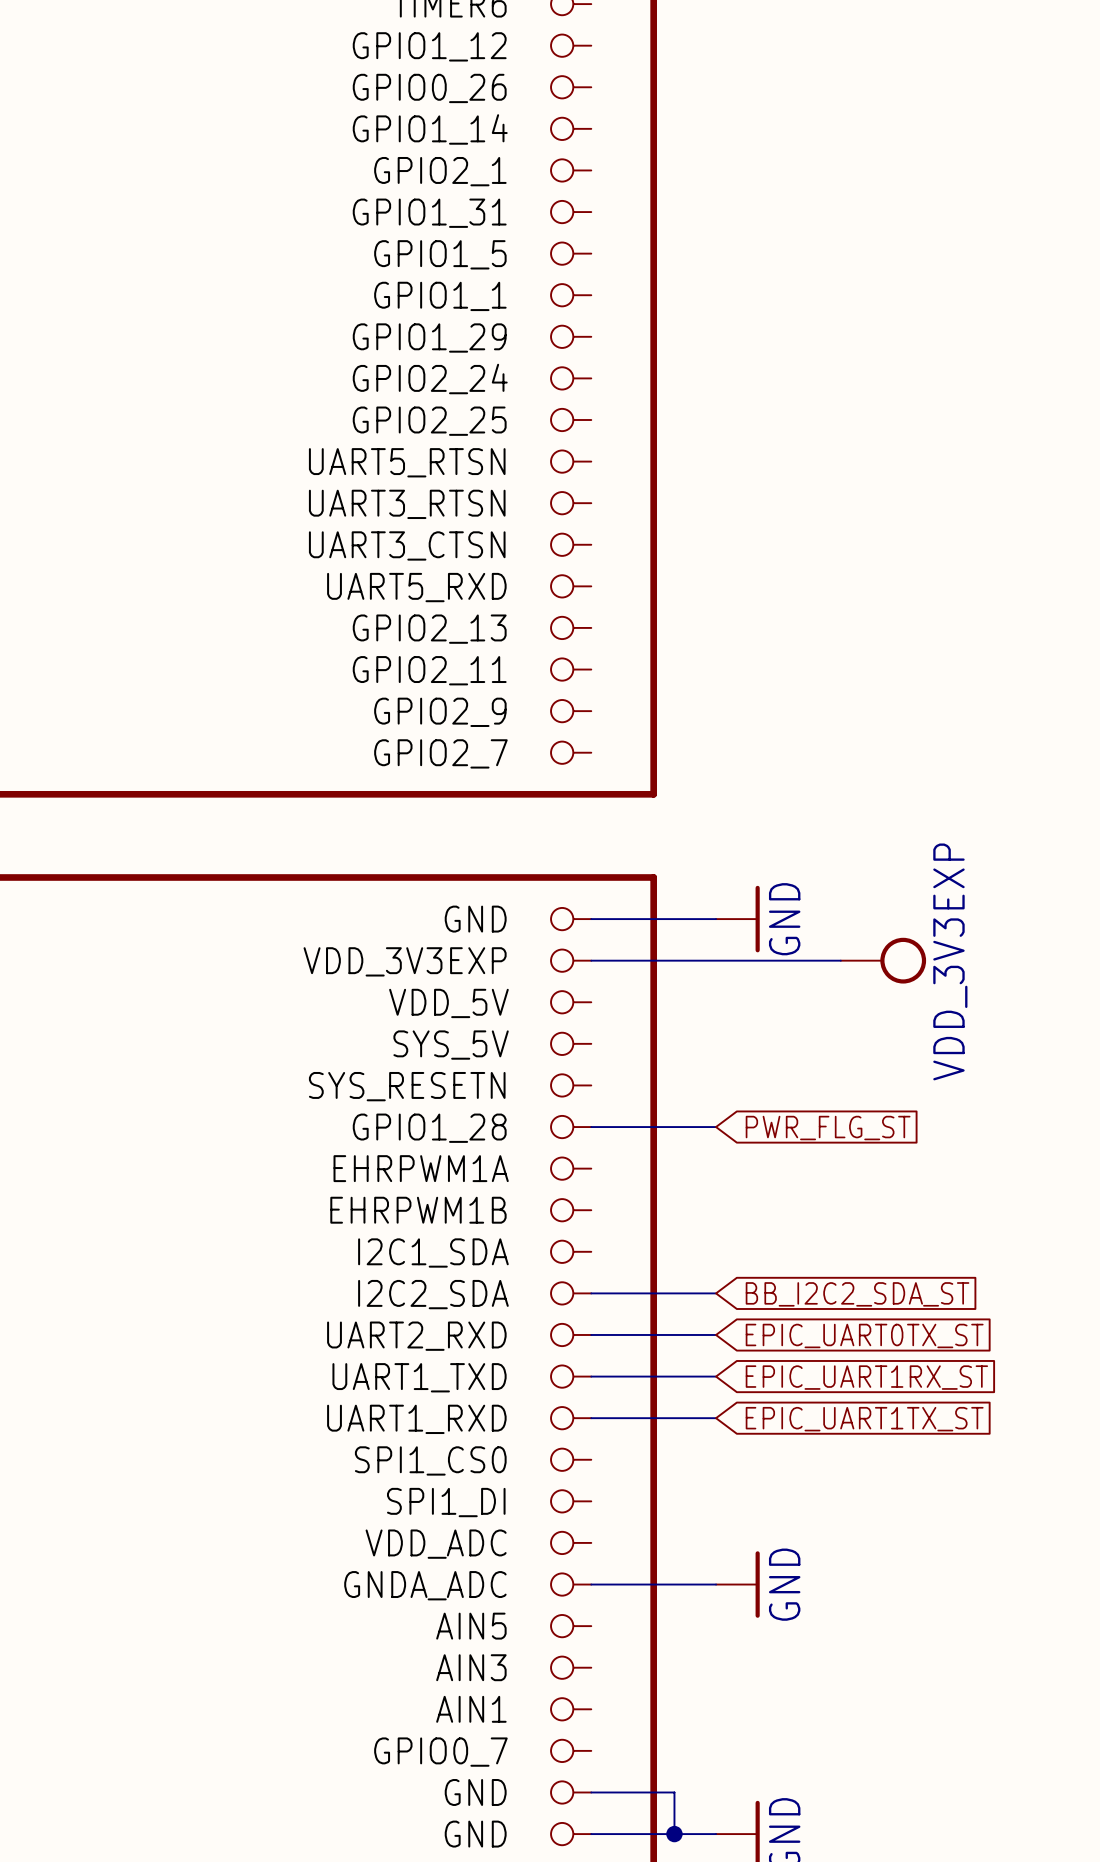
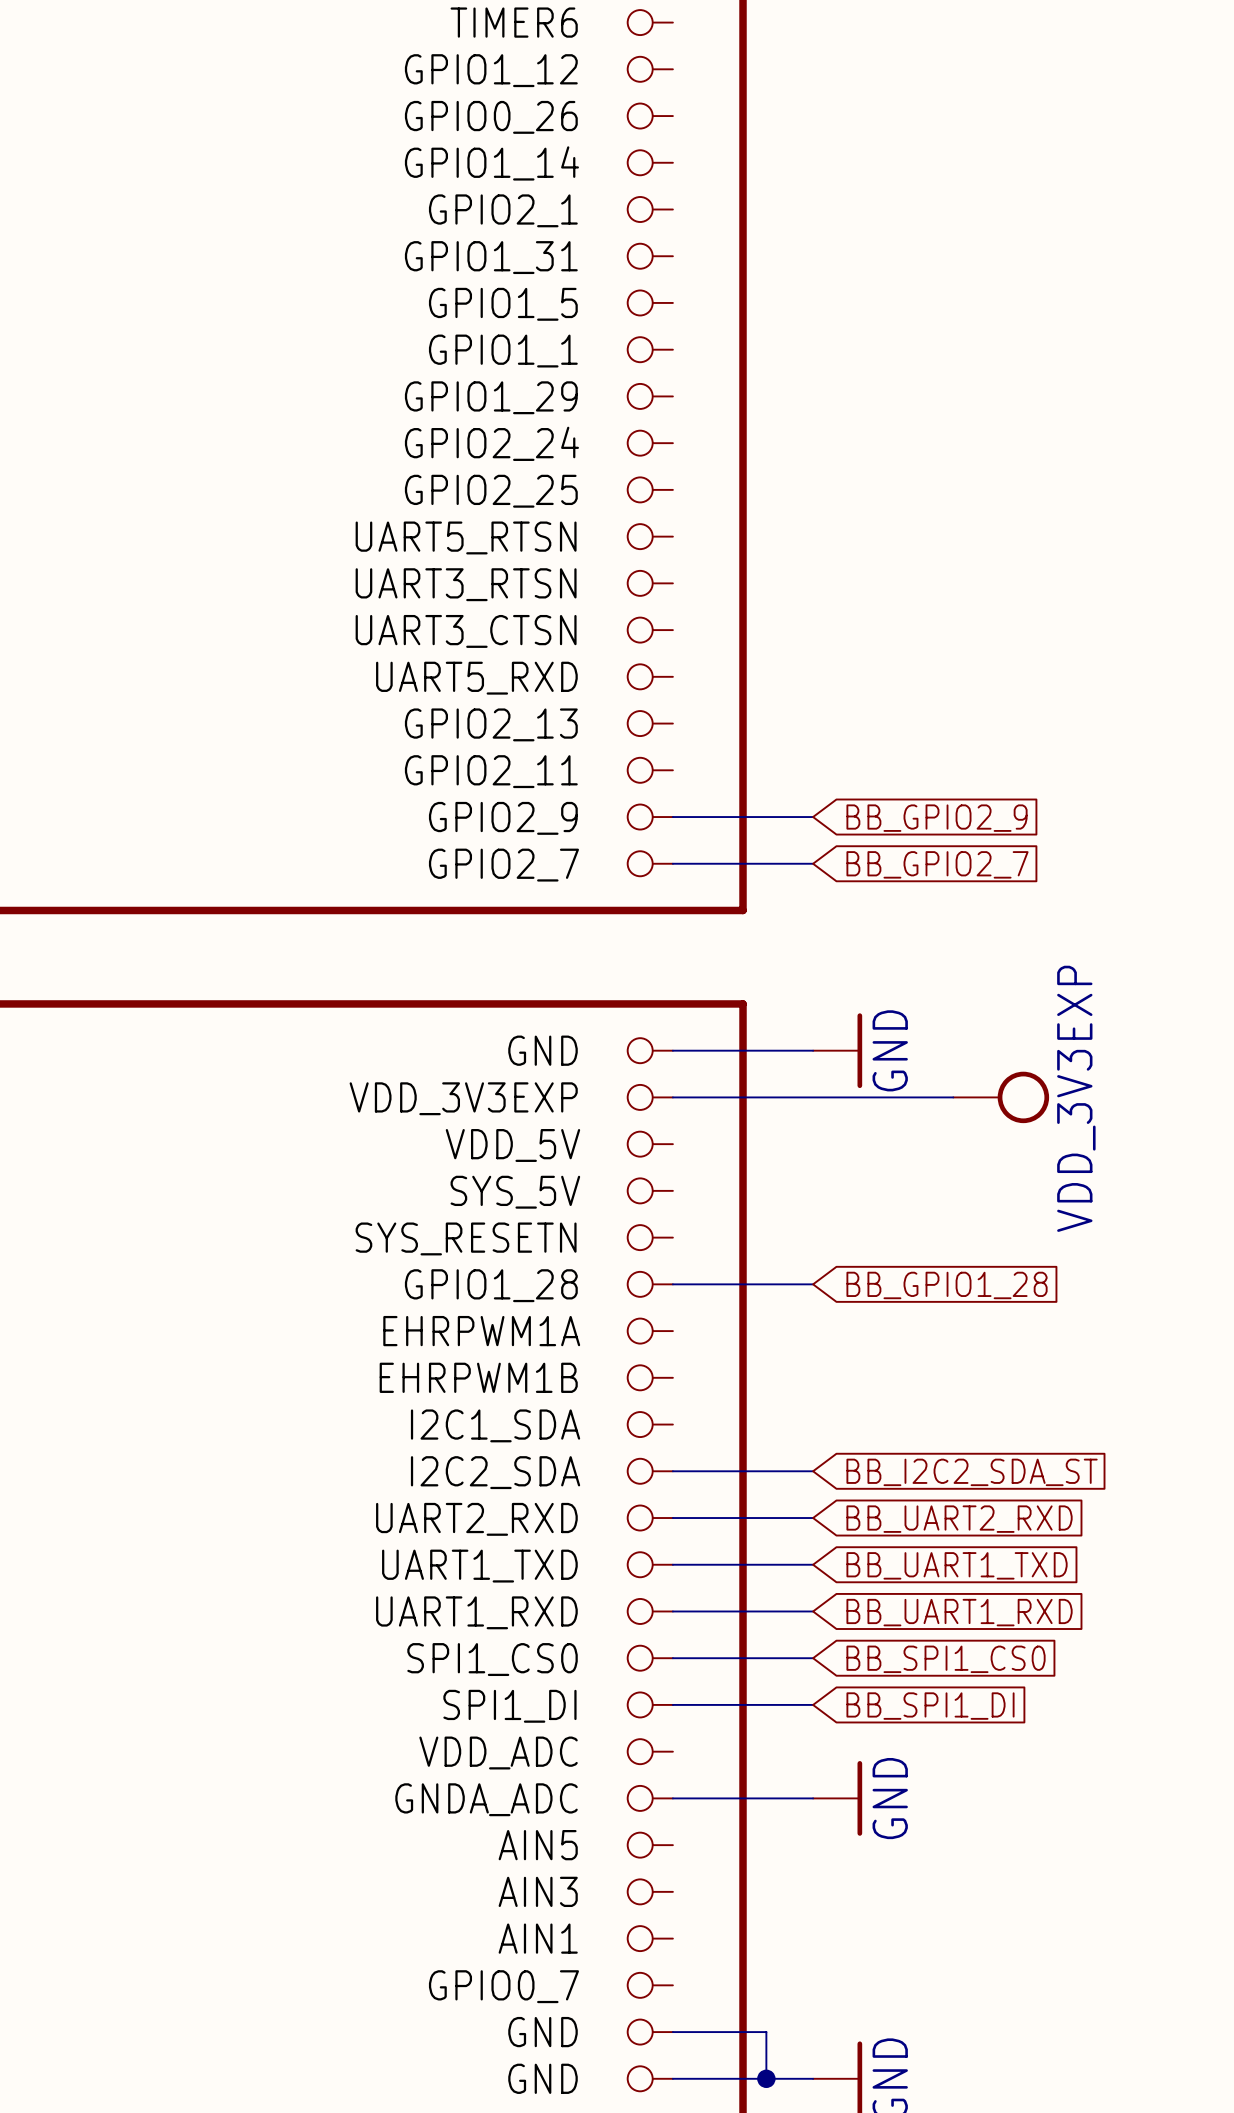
wire: none -> (672, 817) (813, 817)
global label: none -> BB_GPIO2_9 (937, 818)
wire: none -> (672, 863) (813, 863)
global label: none -> BB_GPIO2_7 (937, 864)
global label: PWR_FLG_ST (828, 1128) -> BB_GPIO1_28 (947, 1285)
global label: EPIC_UART0TX_ST (864, 1335) -> BB_UART2_RXD (959, 1519)
global label: EPIC_UART1RX_ST (866, 1377) -> BB_UART1_TXD (957, 1565)
global label: EPIC_UART1TX_ST (864, 1419) -> BB_UART1_RXD (959, 1612)
wire: none -> (672, 1658) (813, 1658)
global label: none -> BB_SPI1_CS0 (946, 1659)
wire: none -> (672, 1704) (813, 1704)
global label: none -> BB_SPI1_DI (930, 1706)

